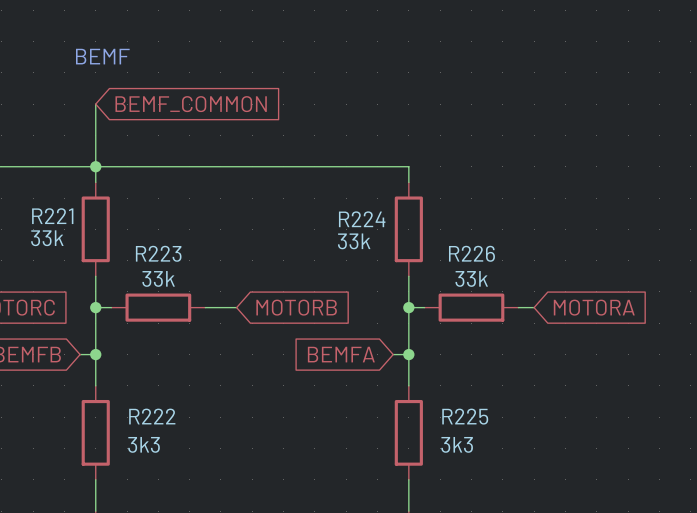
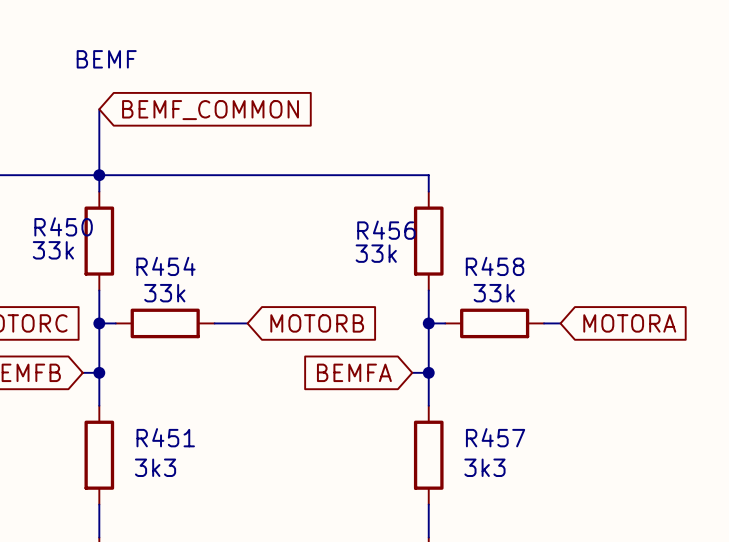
R221 name: R221 (52, 216) -> R450 (63, 226)
R224 name: R224 (362, 219) -> R456 (386, 230)
R223 name: R223 (158, 253) -> R454 (165, 266)
R226 name: R226 (471, 253) -> R458 (495, 266)
R222 name: R222 (152, 416) -> R451 (165, 437)
R225 name: R225 (465, 416) -> R457 (495, 437)

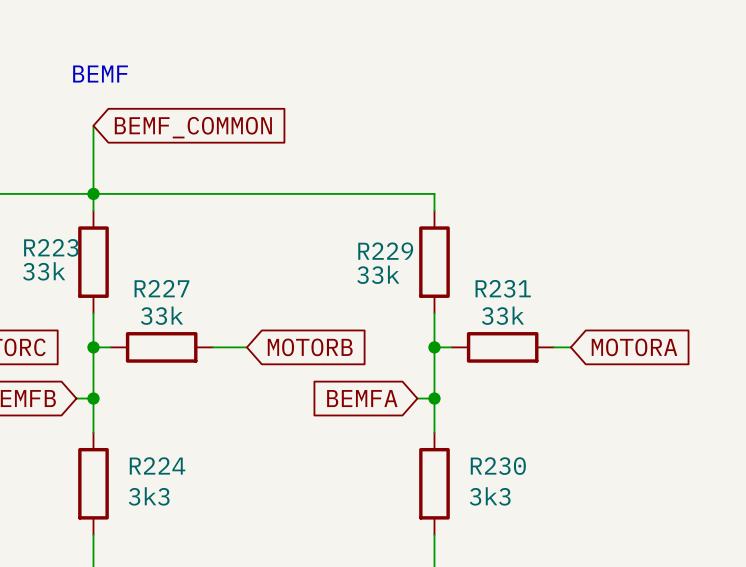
R450 name: R450 (63, 226) -> R223 (51, 247)
R456 name: R456 (386, 230) -> R229 (385, 251)
R454 name: R454 (165, 266) -> R227 (161, 288)
R458 name: R458 (495, 266) -> R231 (503, 288)
R451 name: R451 (165, 437) -> R224 (157, 465)
R457 name: R457 (495, 437) -> R230 (498, 466)

